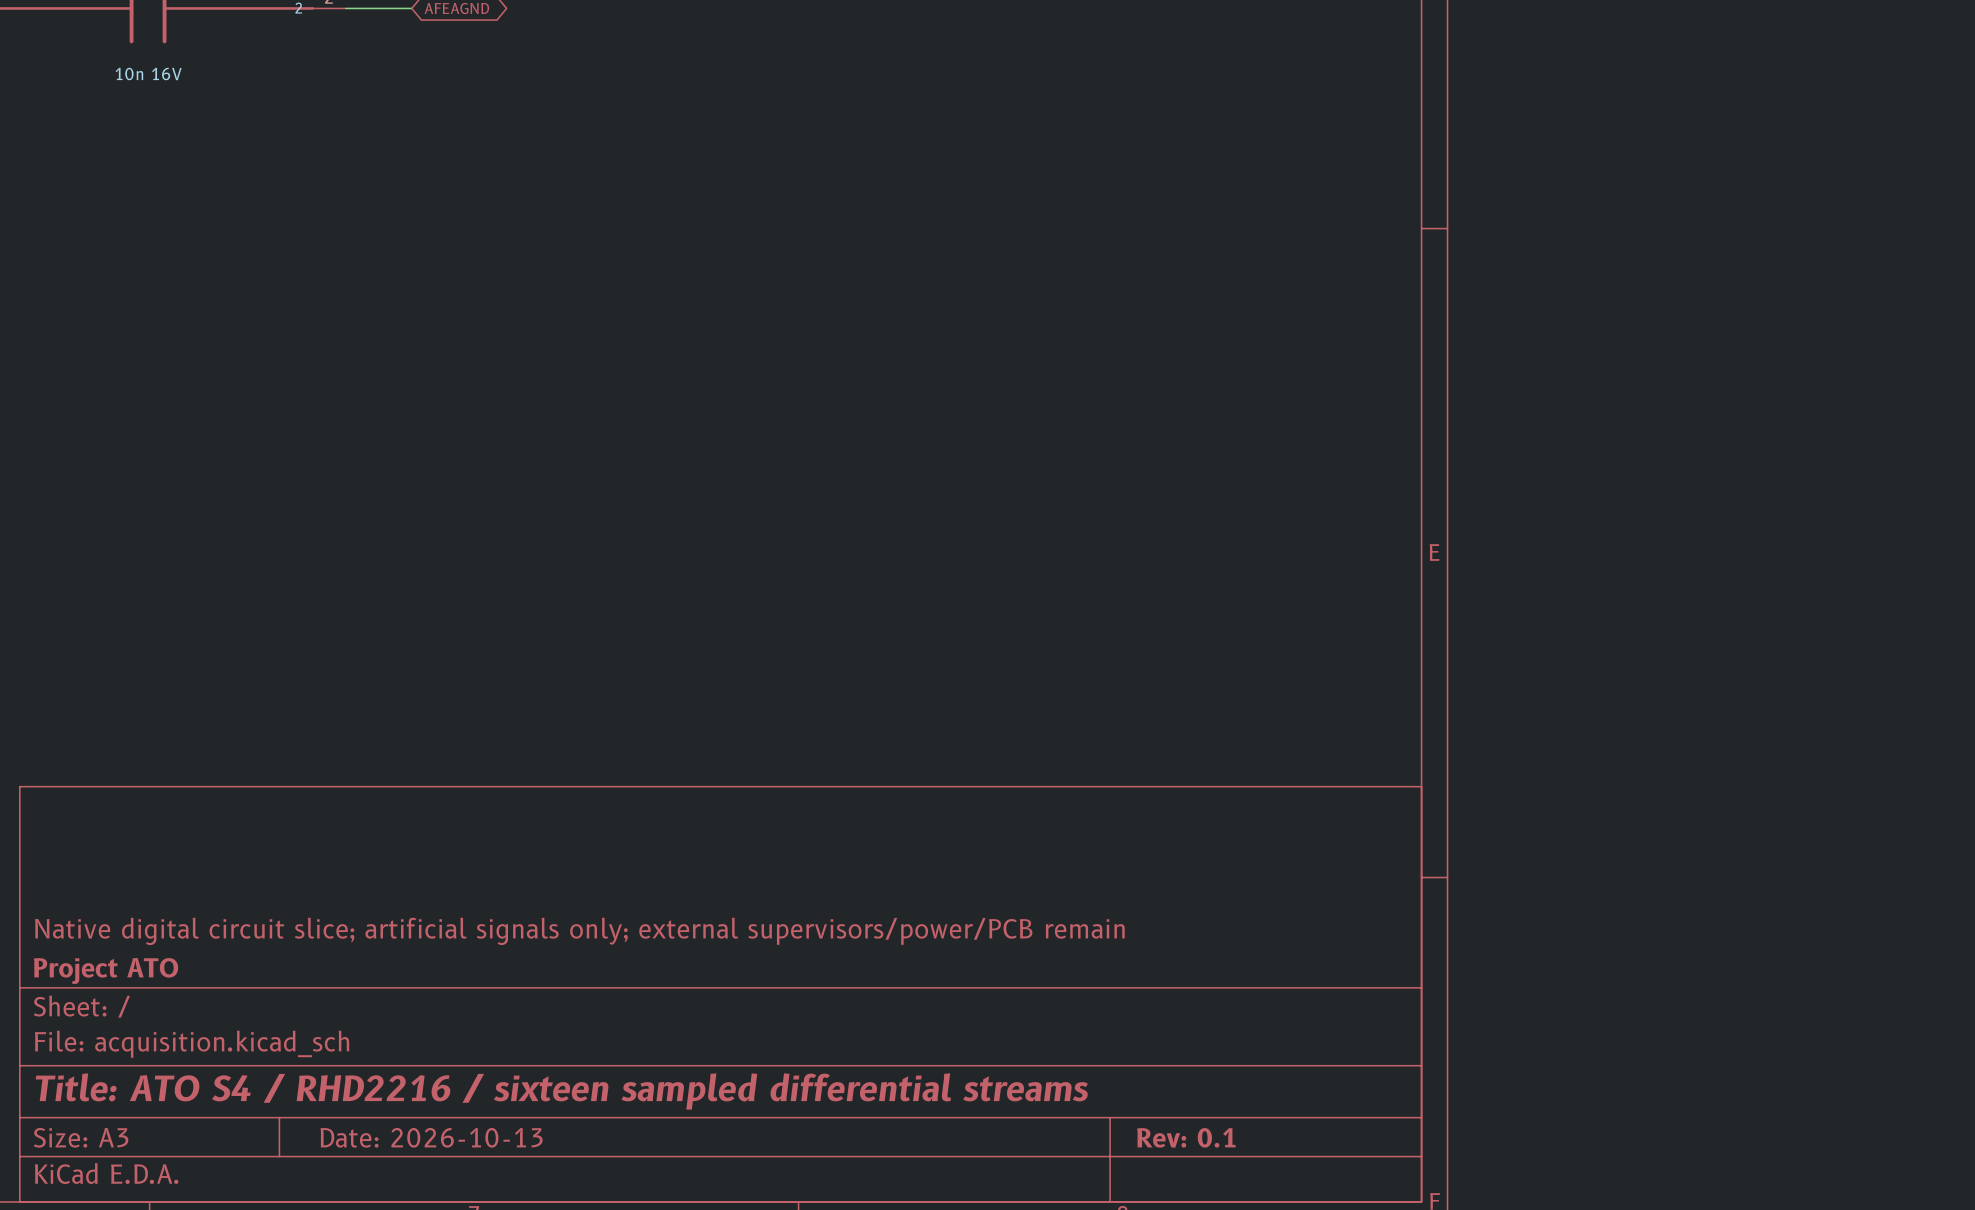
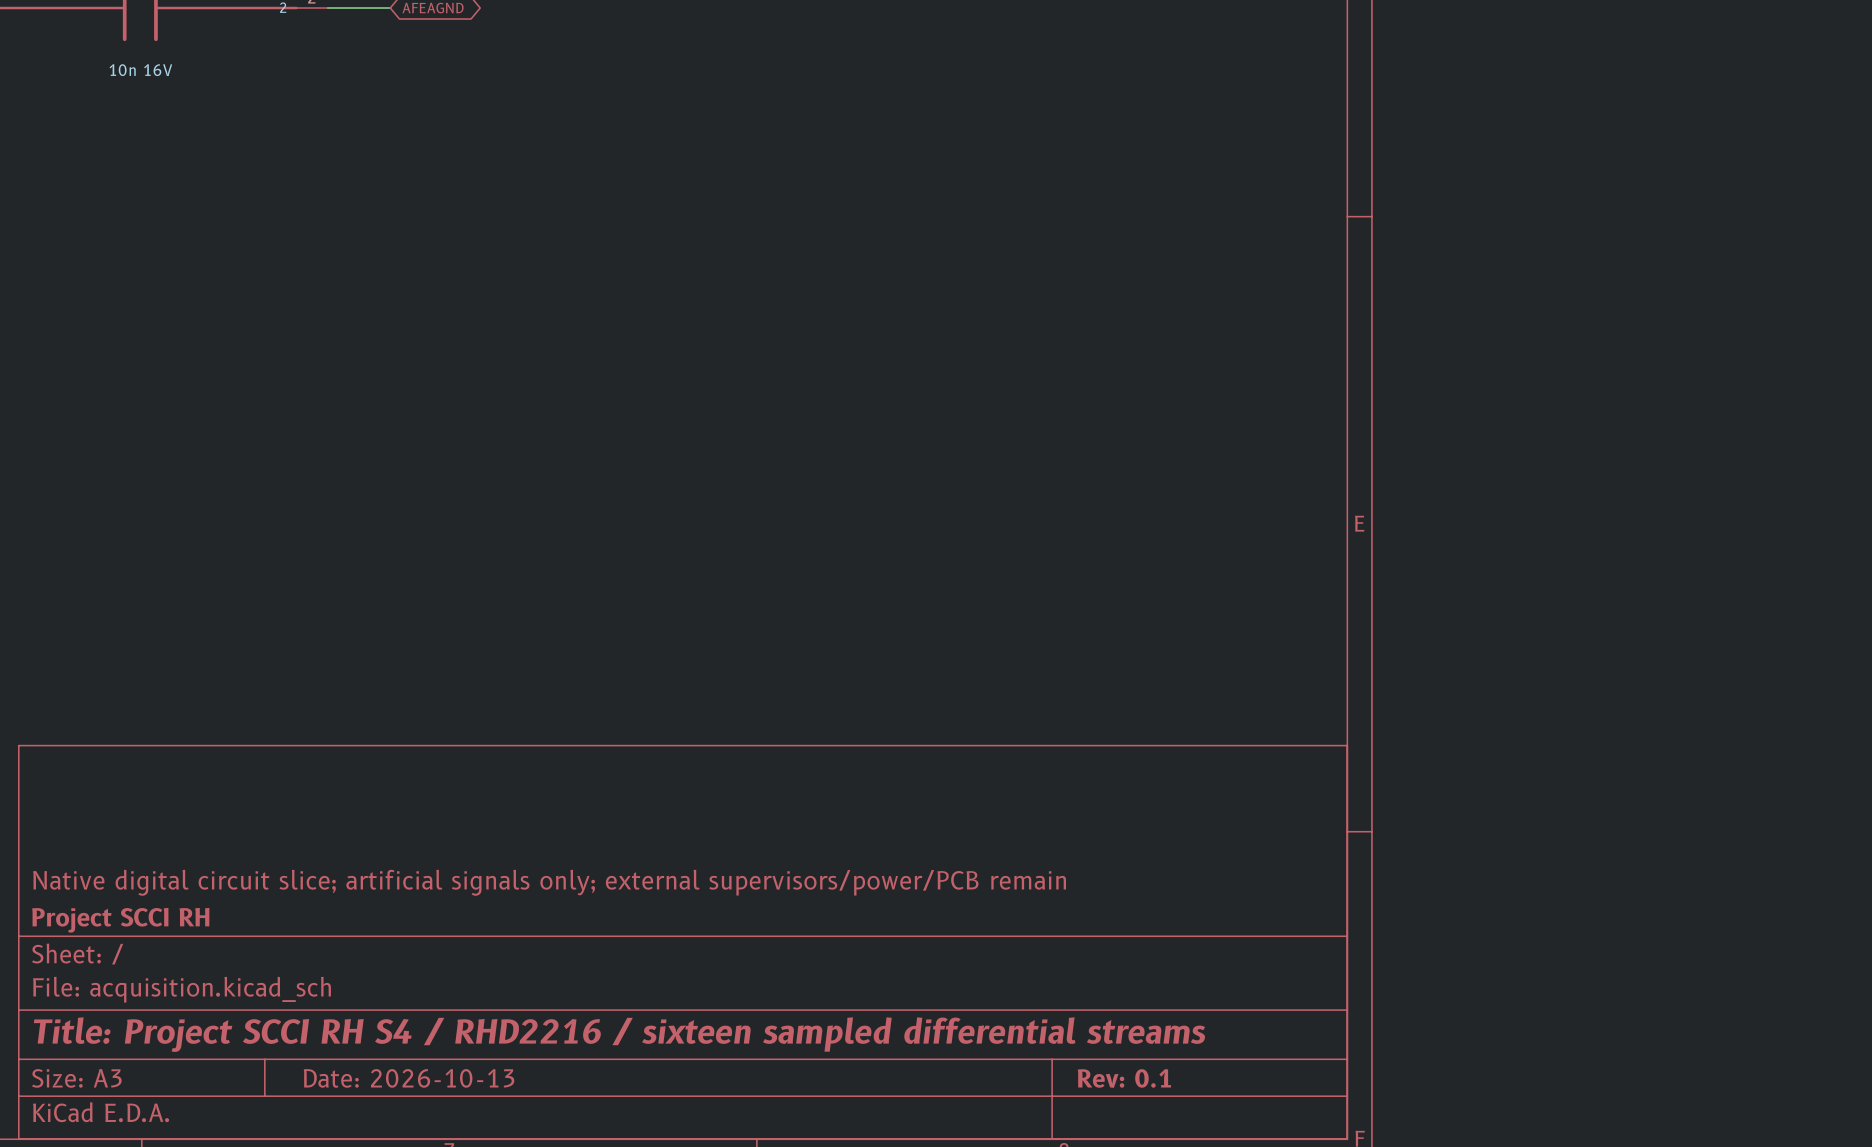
title block: Project ATO (105, 970) -> Project SCCI RH (120, 920)
title block: Title: ATO S4 / RHD2216 / sixteen sampled differential streams (561, 1091) -> Title: Project SCCI RH S4 / RHD2216 / sixteen sampled differential streams (619, 1034)

